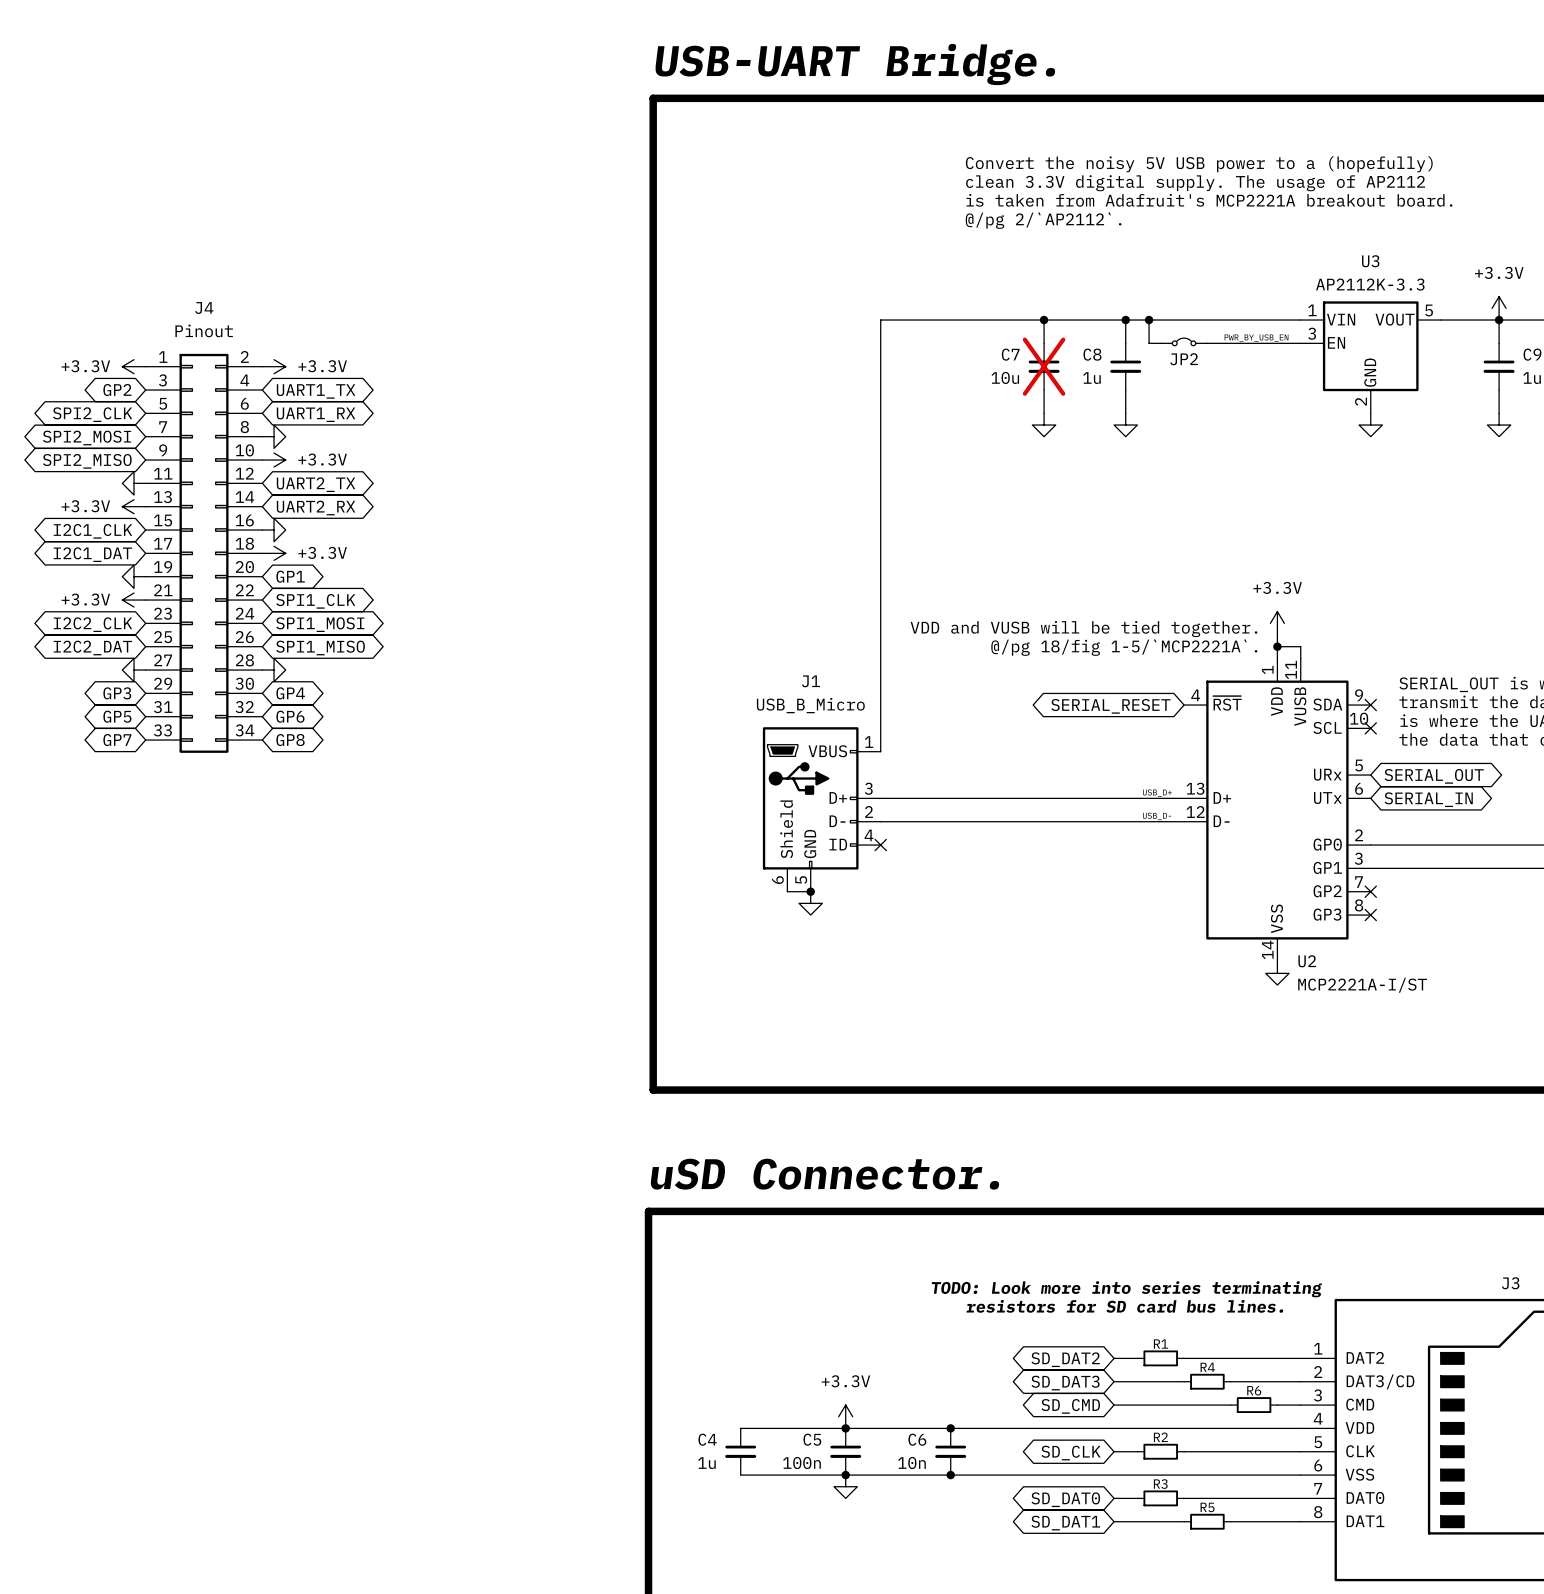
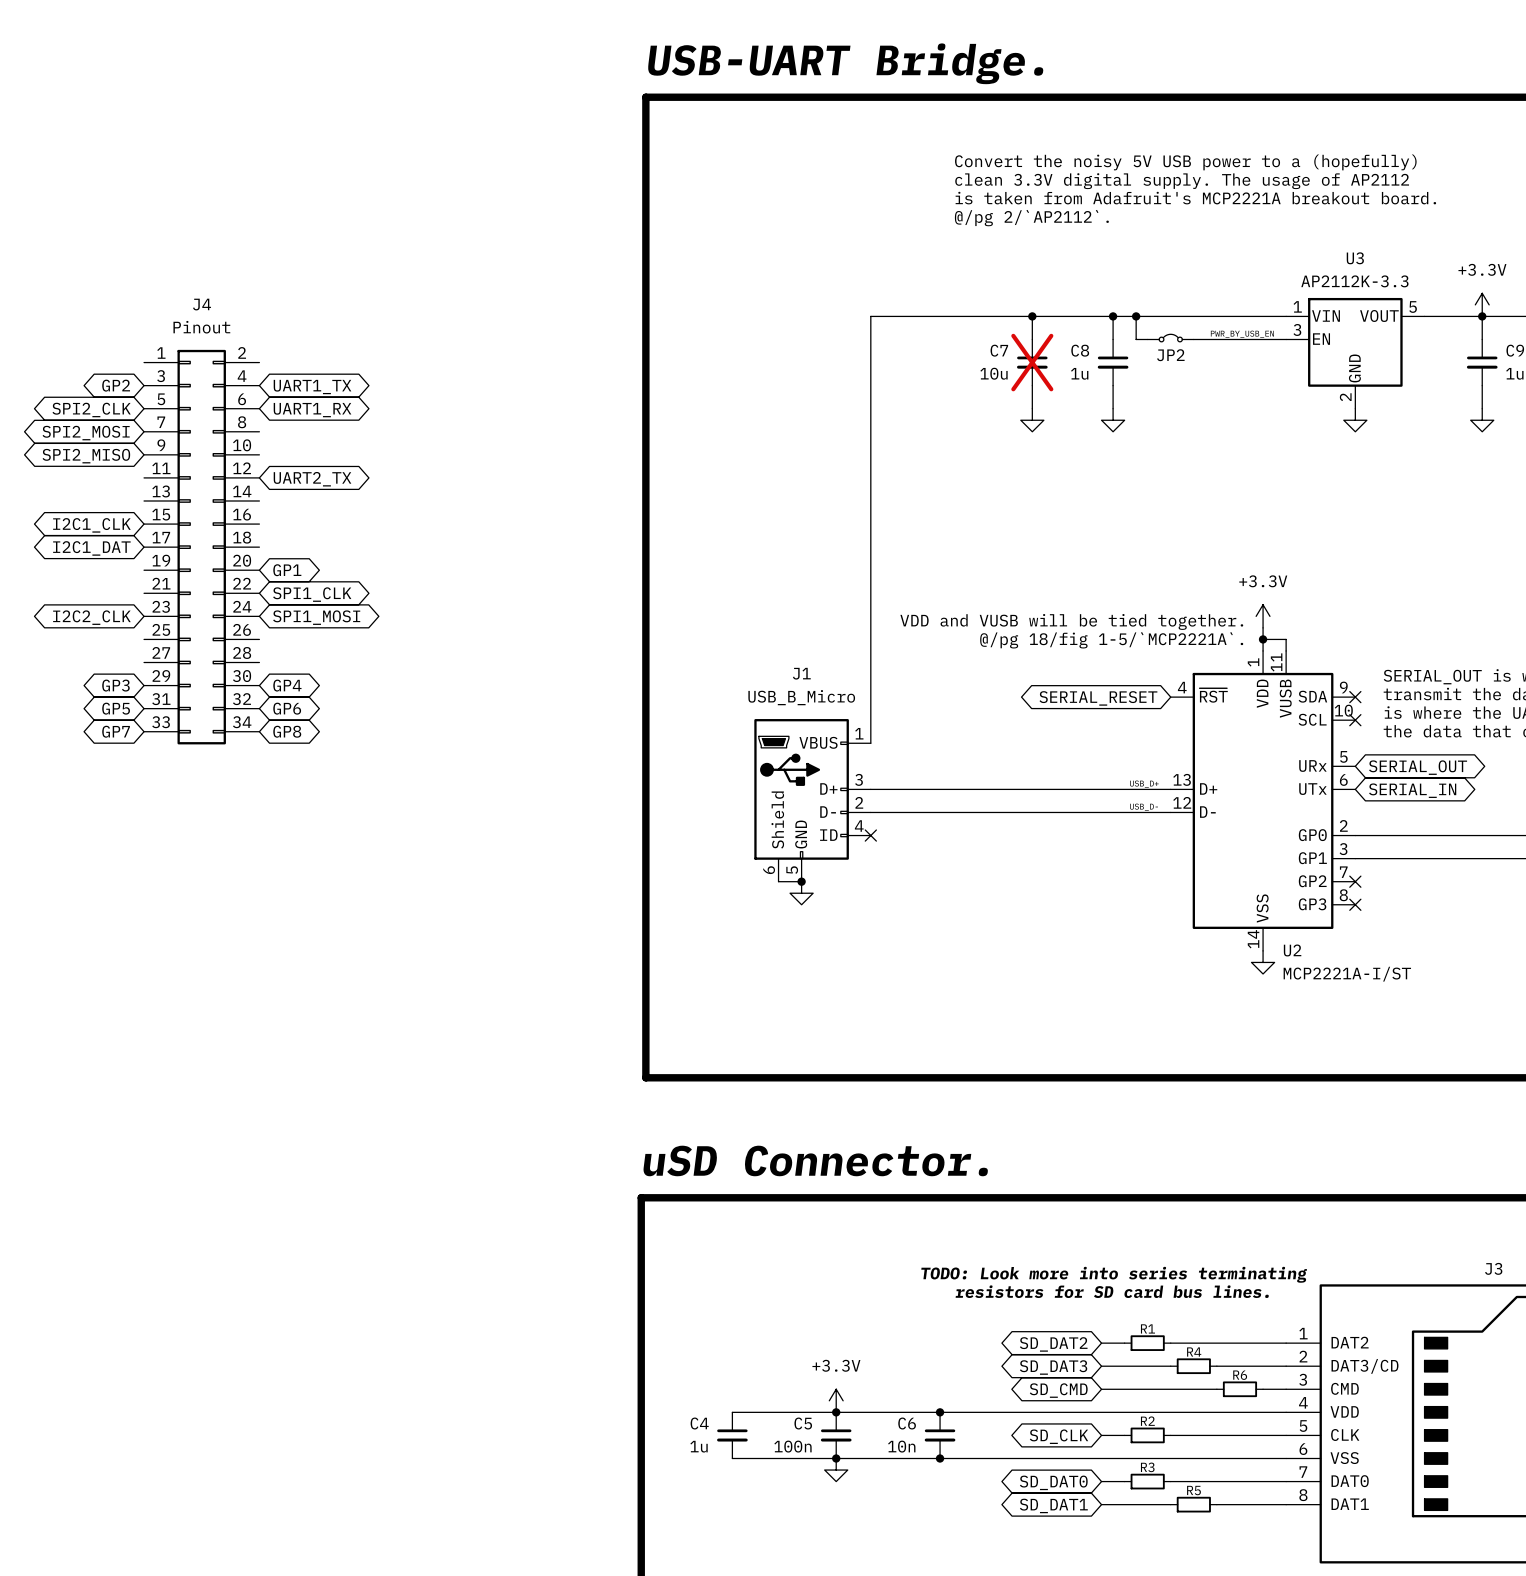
power symbol: +3.3V (134, 366) -> none
power symbol: +3.3V (274, 366) -> none
power symbol: (274, 436) -> none
power symbol: +3.3V (274, 460) -> none
power symbol: (134, 483) -> none
power symbol: +3.3V (134, 506) -> none
global label: UART2_RX (316, 508) -> none
power symbol: (274, 530) -> none
power symbol: +3.3V (274, 553) -> none
power symbol: (134, 576) -> none
power symbol: +3.3V (134, 600) -> none
global label: I2C2_DAT (92, 648) -> none
global label: SPI1_MISO (320, 648) -> none
power symbol: (134, 670) -> none
power symbol: (274, 670) -> none

